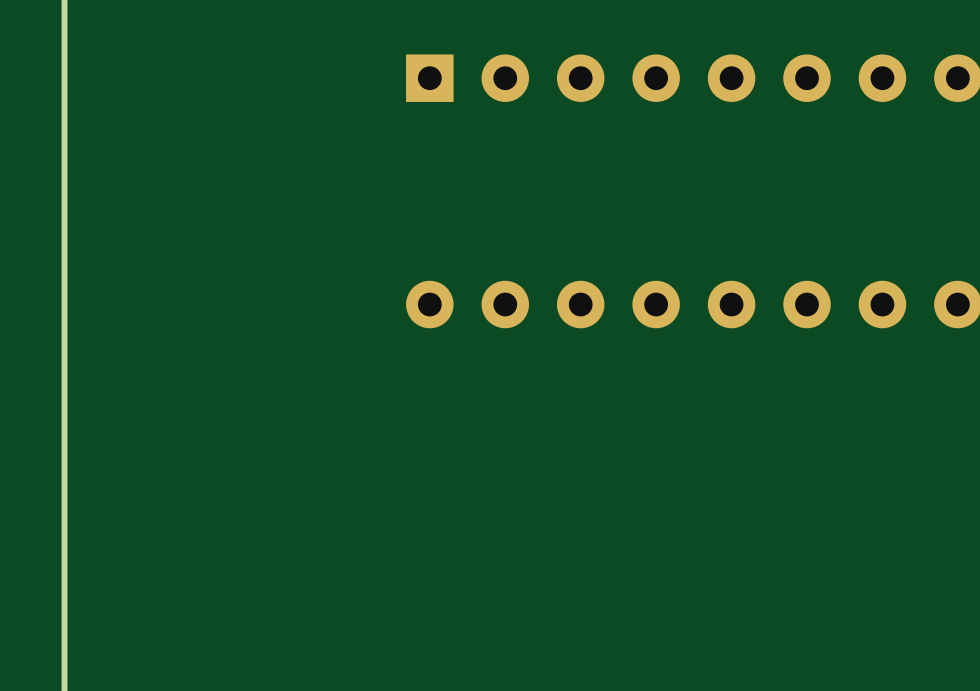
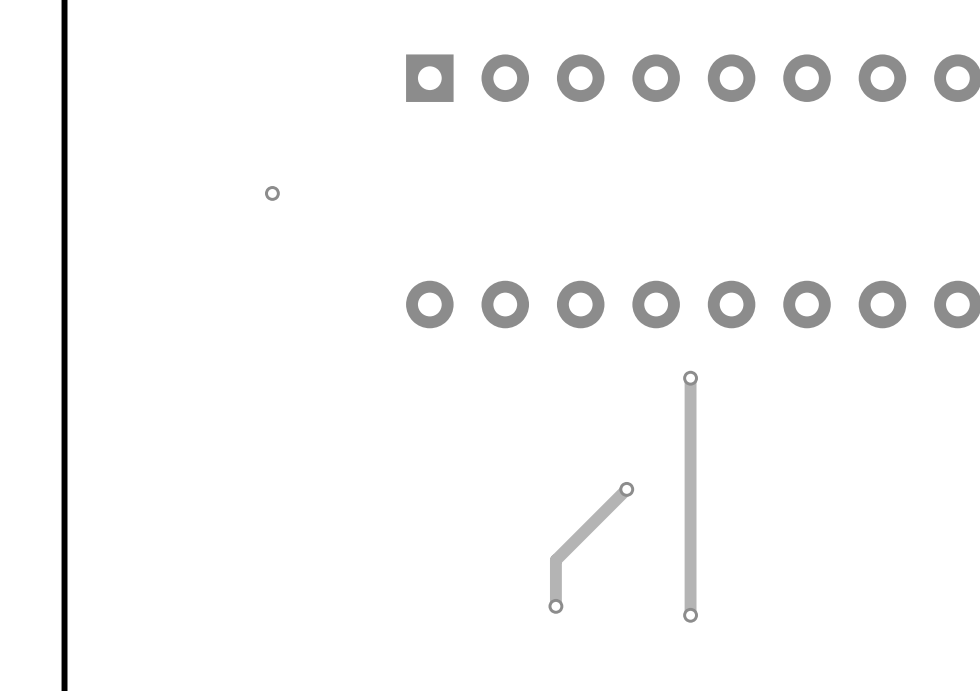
via: none -> (272, 193)
track: none -> (690, 378) (690, 615)
via: none -> (690, 378)
track: none -> (626, 489) (555, 560) (555, 606)
via: none -> (626, 489)
via: none -> (555, 606)
via: none -> (690, 615)

